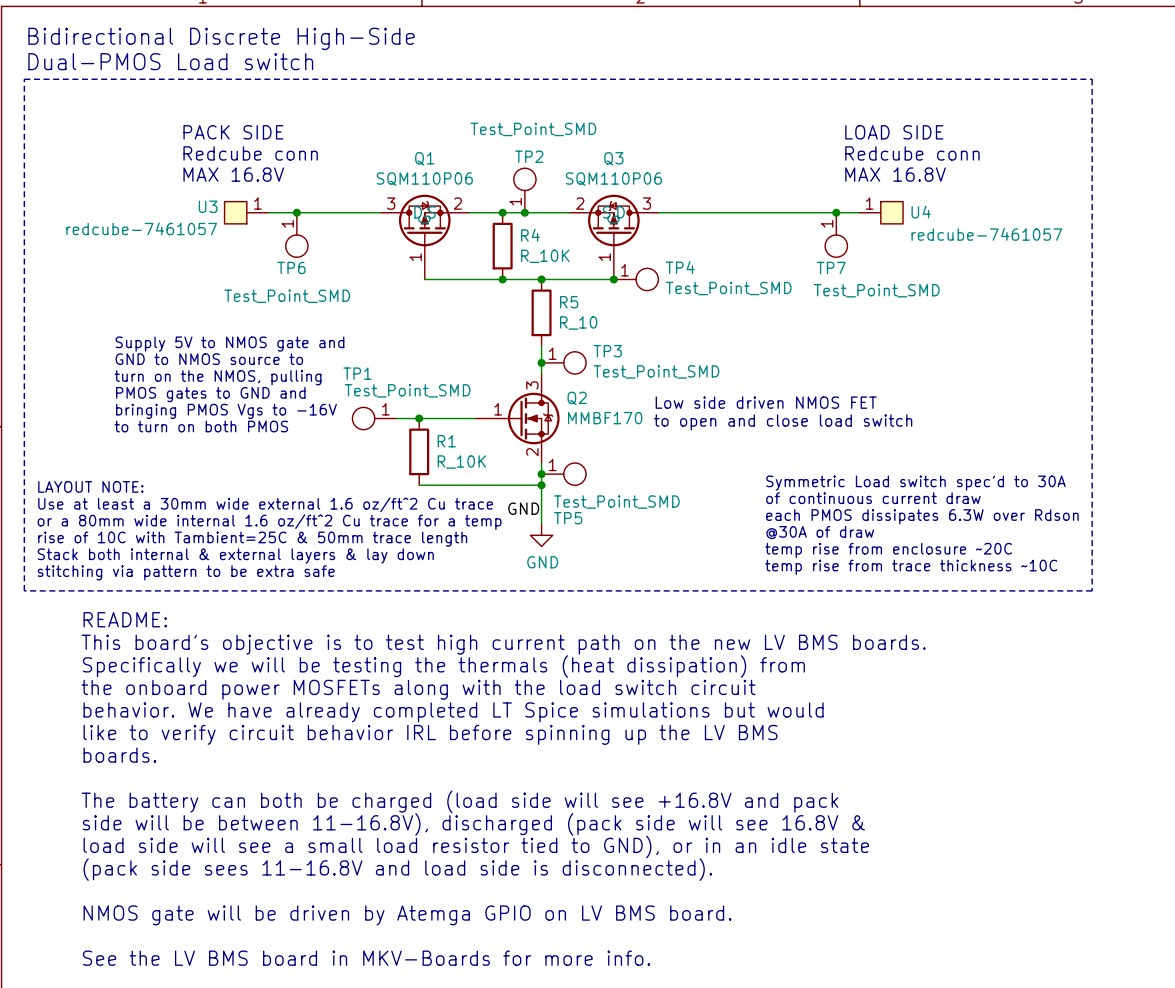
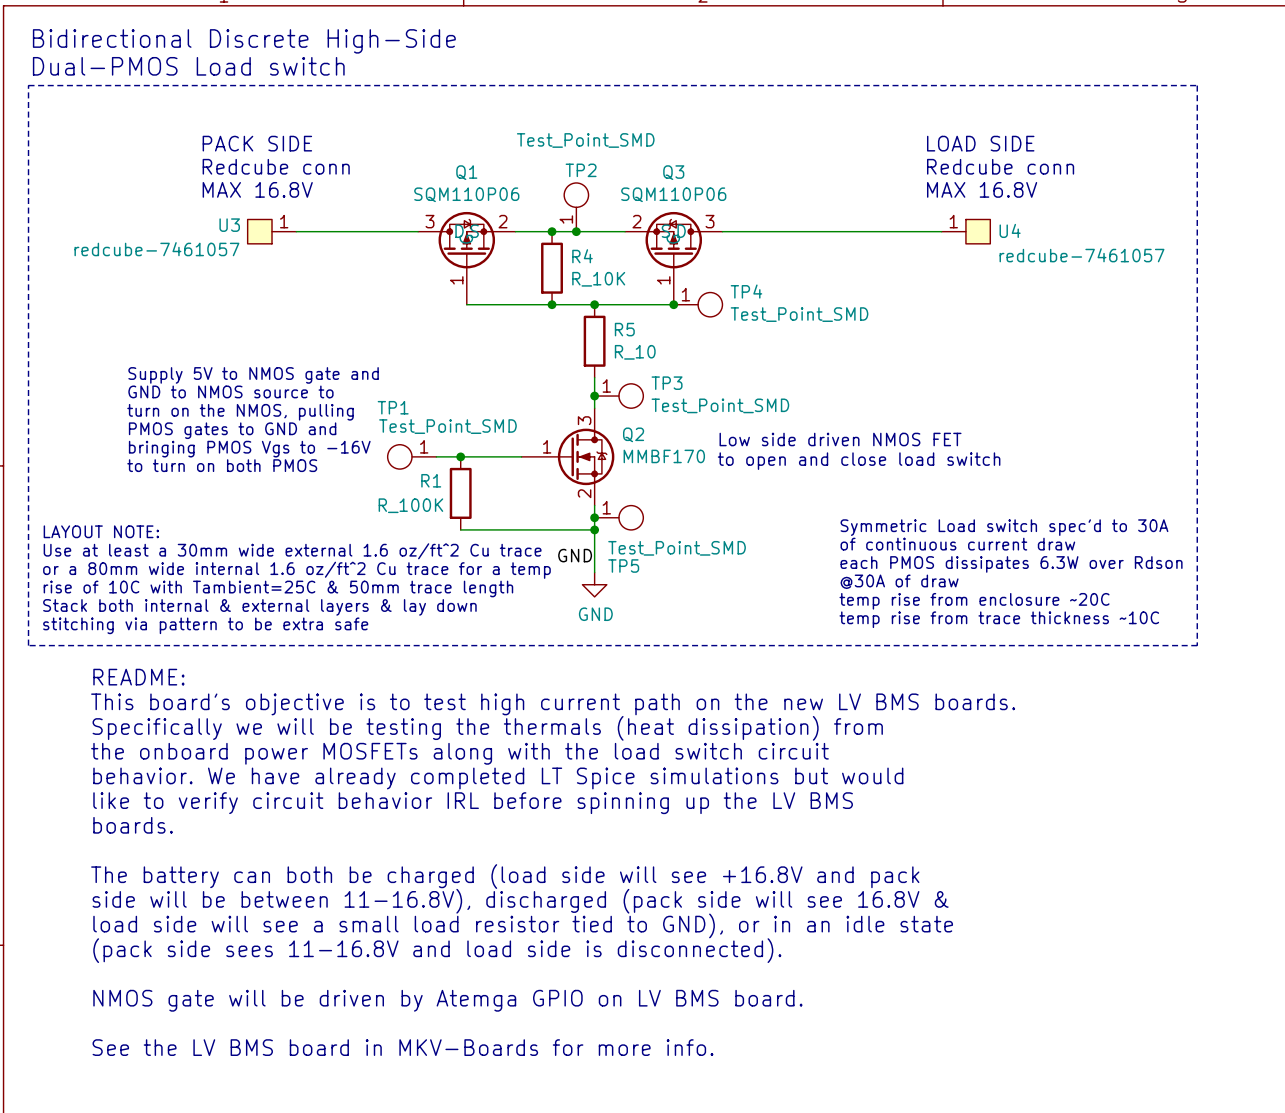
junction: (296, 212) -> none
junction: (836, 212) -> none
TP6: Test_Point_SMD (296, 234) -> none
TP7: Test_Point_SMD (836, 234) -> none
R1 name position: R1 (446, 441) -> R1 (431, 480)
R1 value: R_10K (461, 462) -> R_100K (410, 505)

